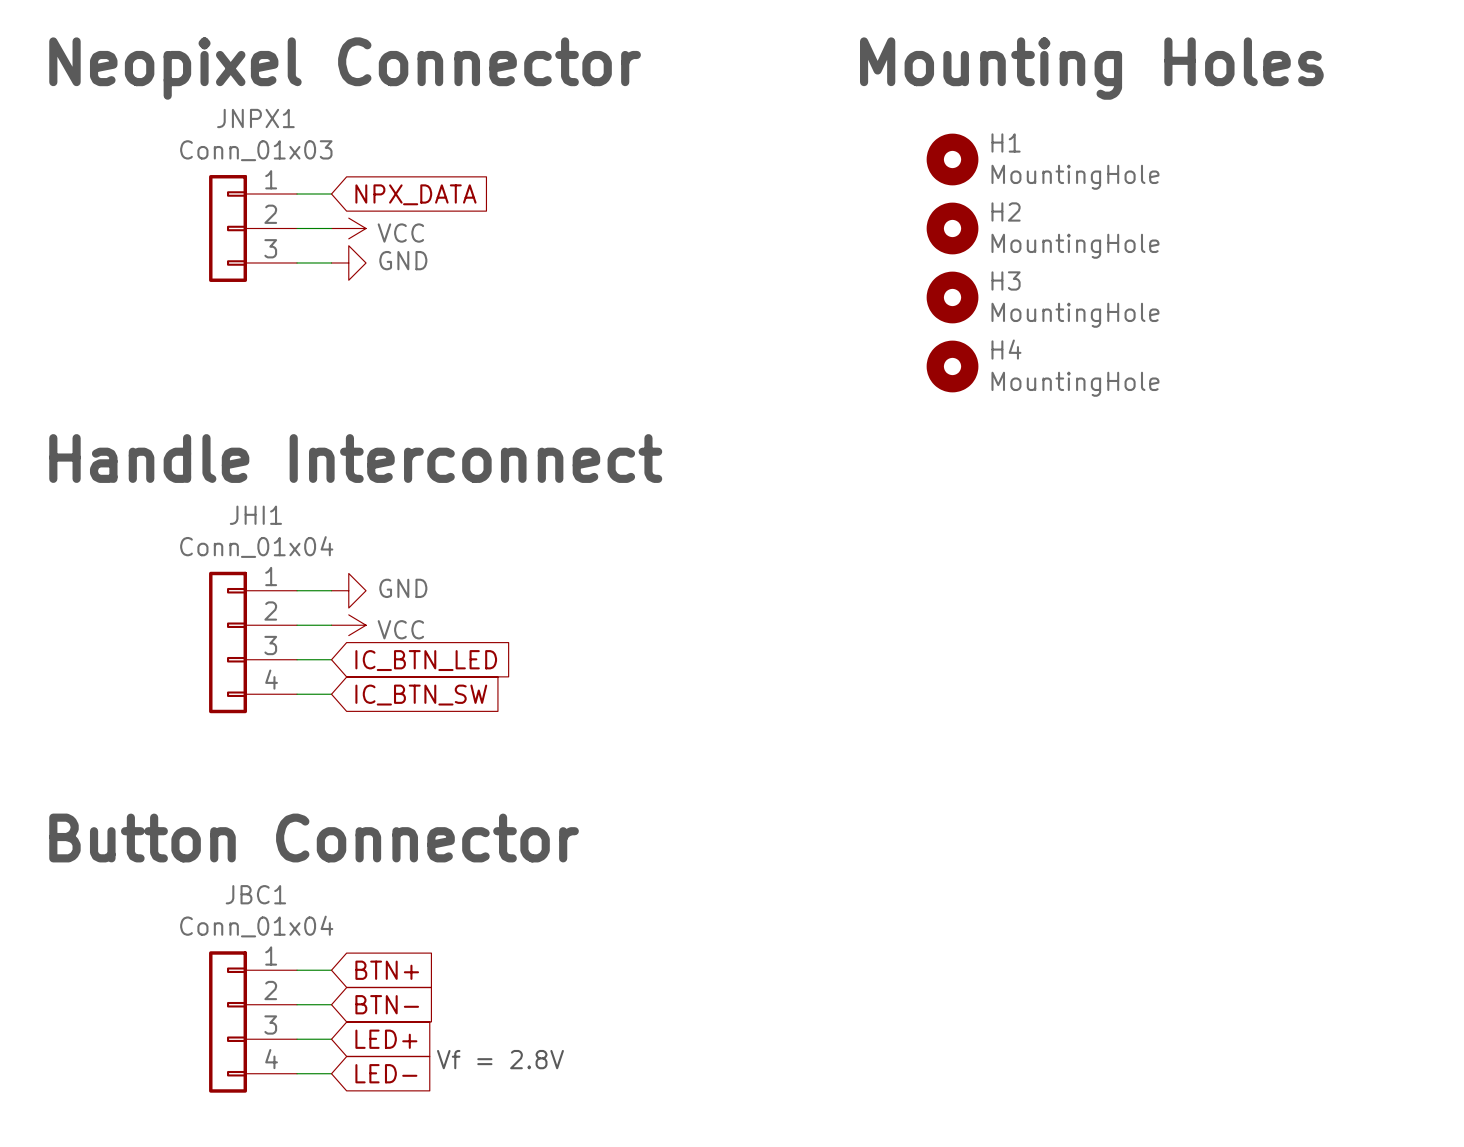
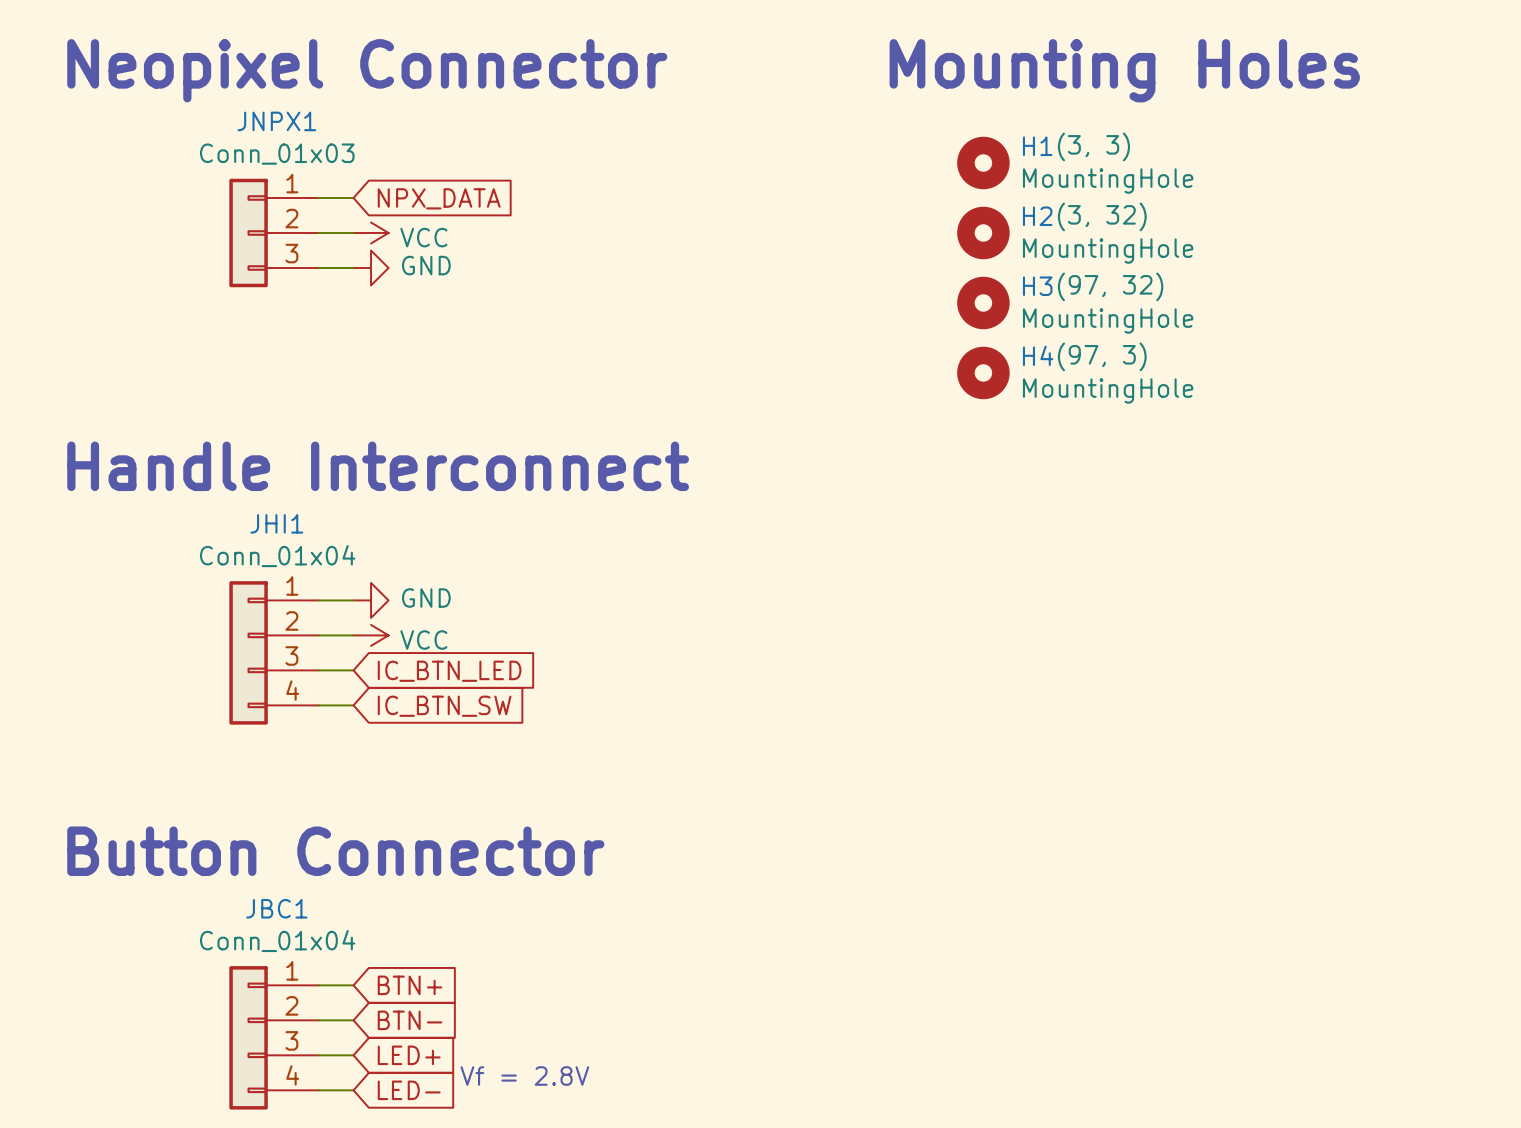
H1 text: none -> (3, 3) (1093, 146)
H2 text: none -> (3, 32) (1102, 216)
H3 text: none -> (97, 32) (1110, 286)
H4 text: none -> (97, 3) (1102, 356)

